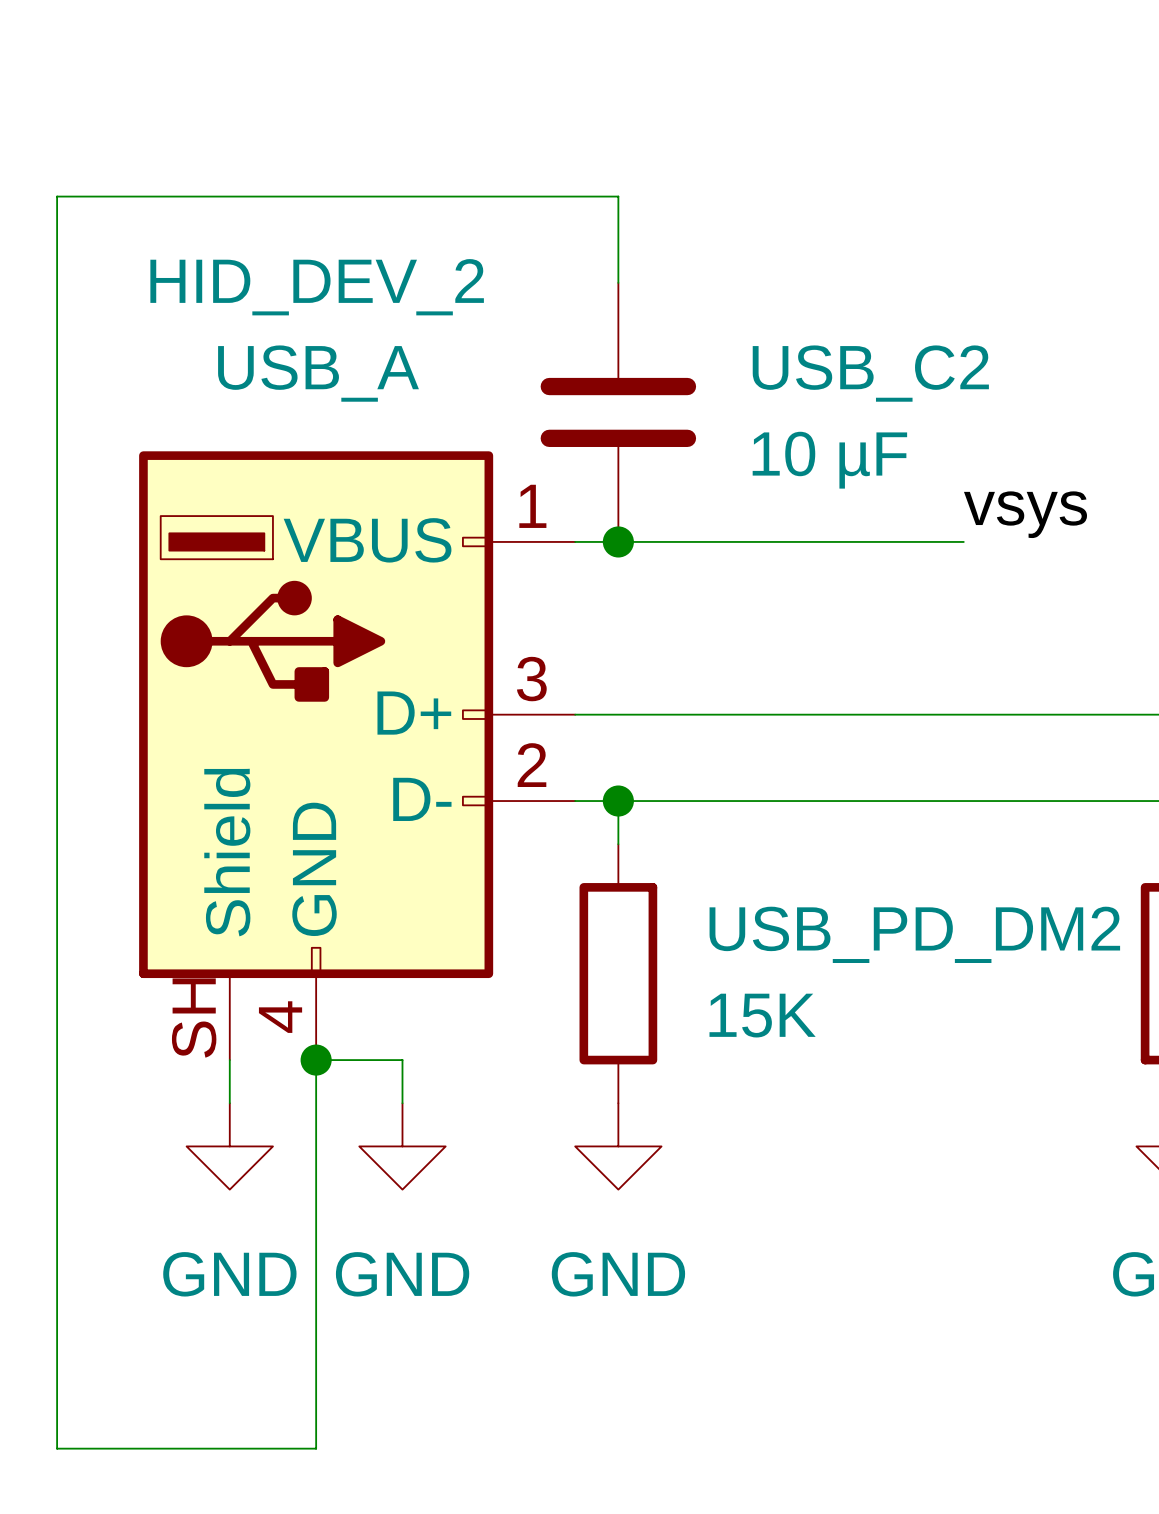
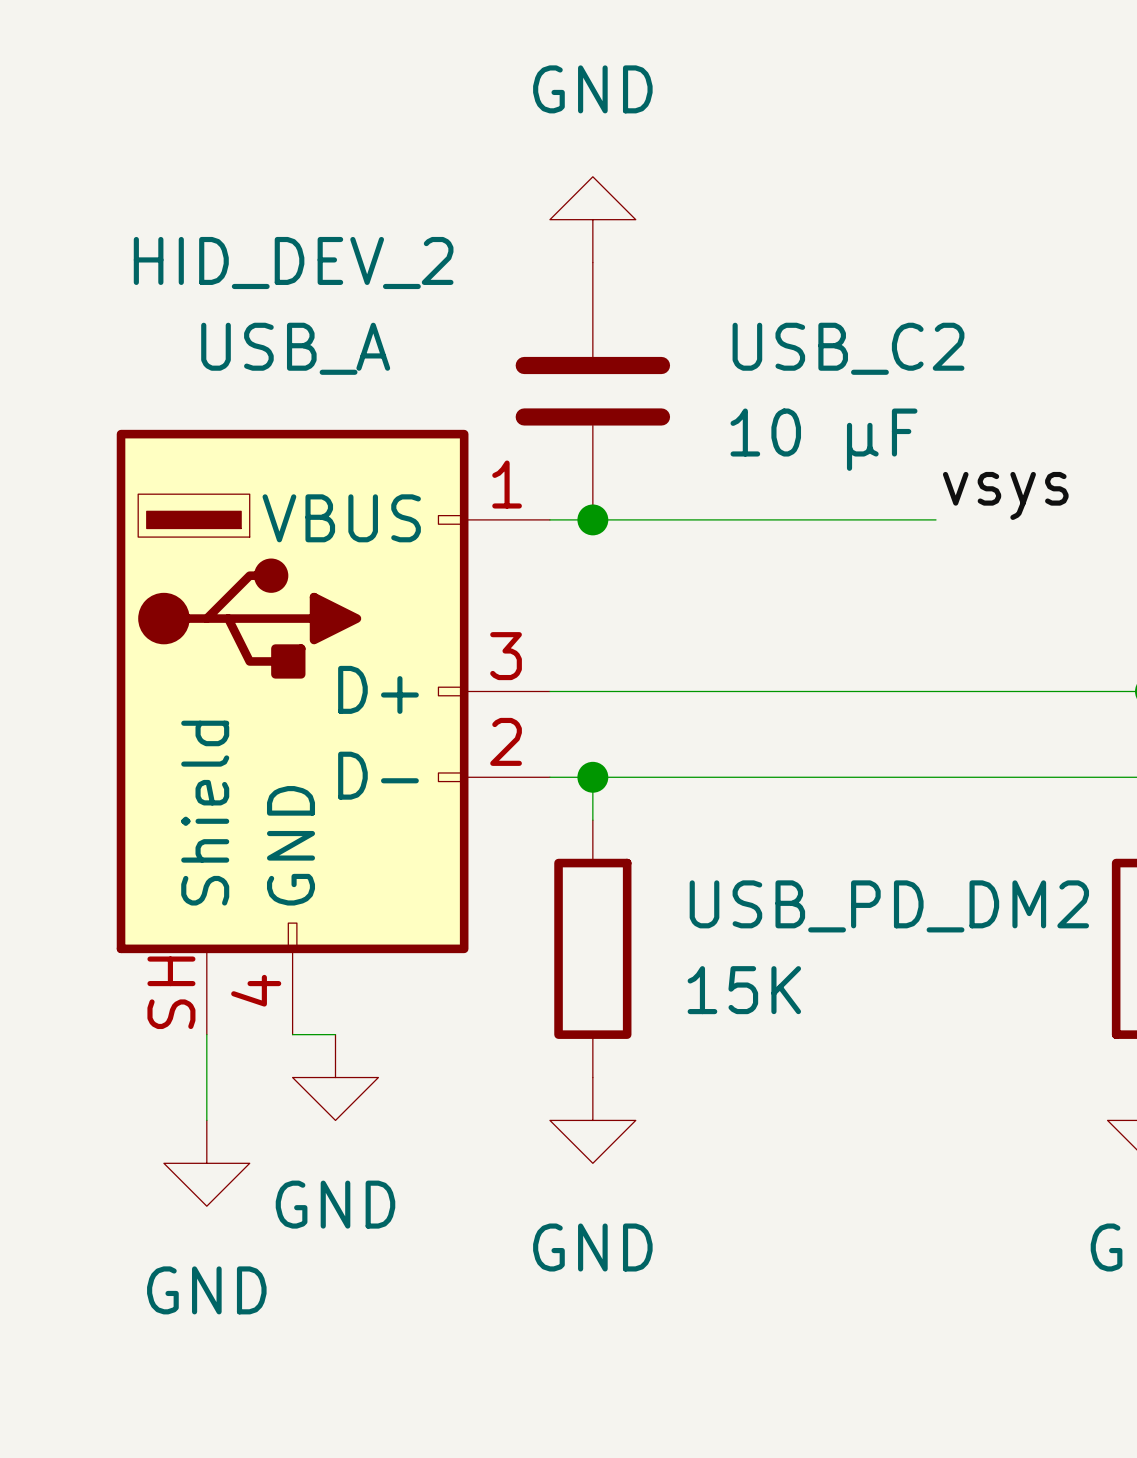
power symbol: none -> GND (592, 219)
wire: (618, 282) (618, 196) (57, 196) (57, 1448) (316, 1448) (316, 1060) -> none
junction: (316, 1060) -> none
wire: (359, 1060) (402, 1060) (402, 1103) -> none
power symbol position: GND (229, 1146) -> GND (206, 1163)
power symbol position: GND (402, 1146) -> GND (335, 1077)

